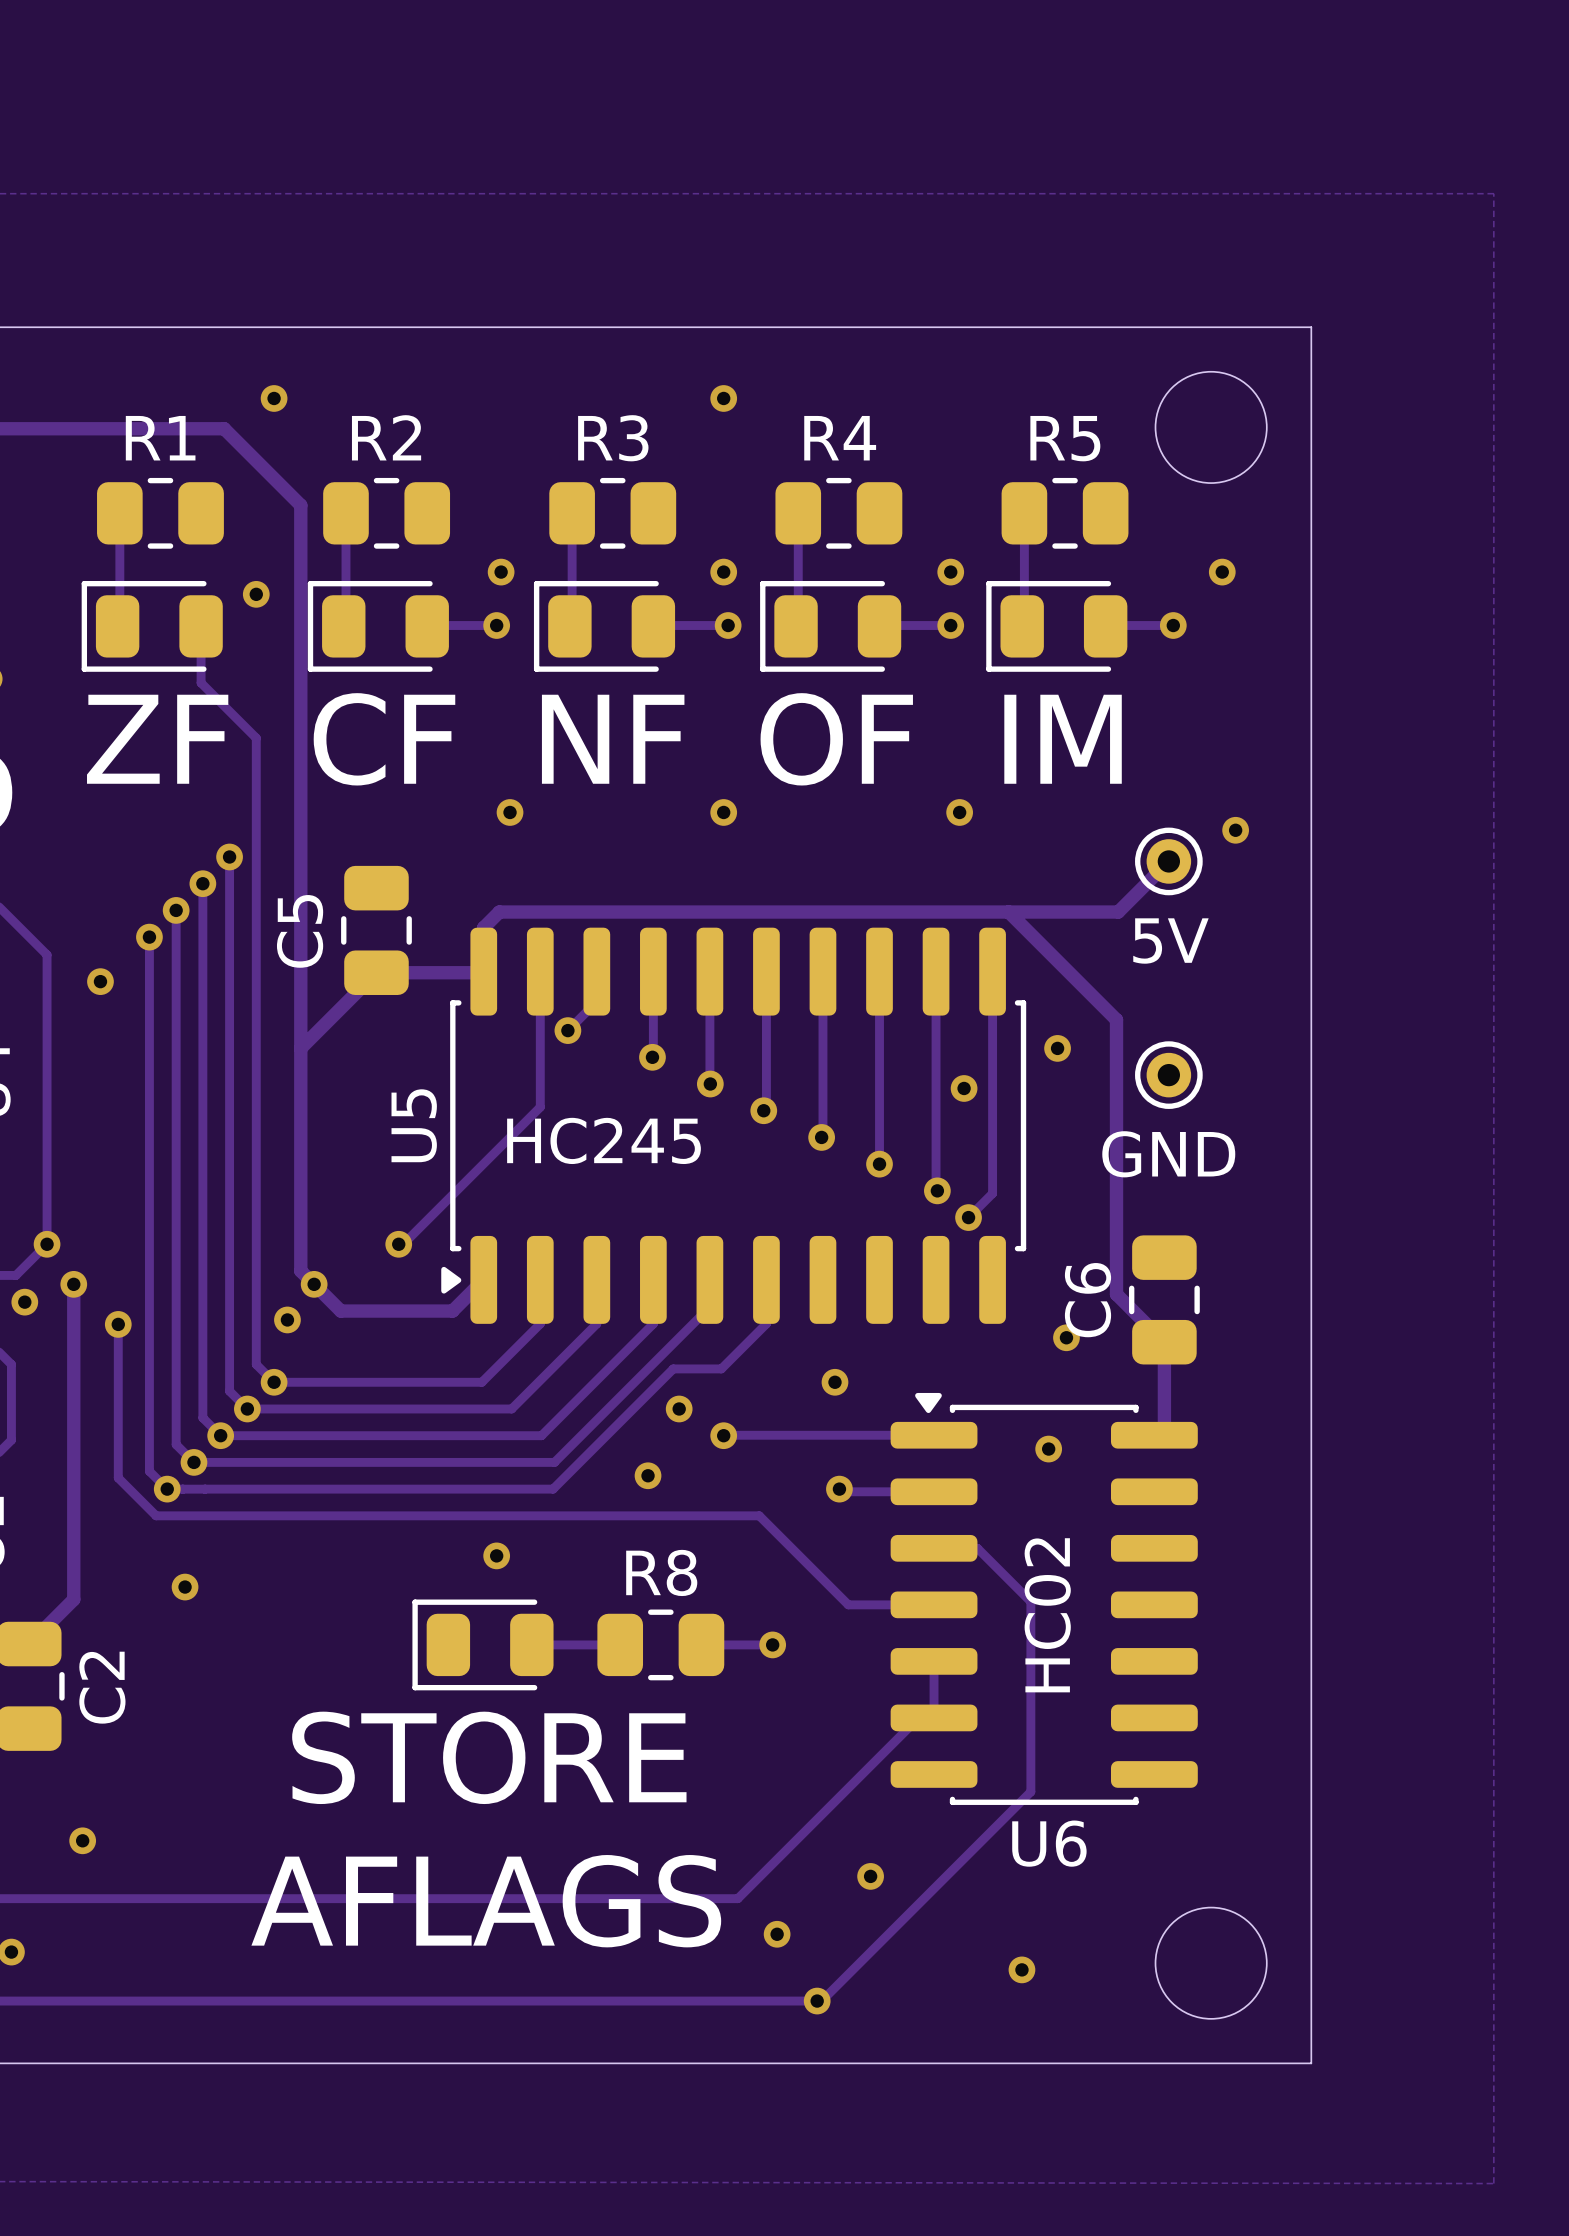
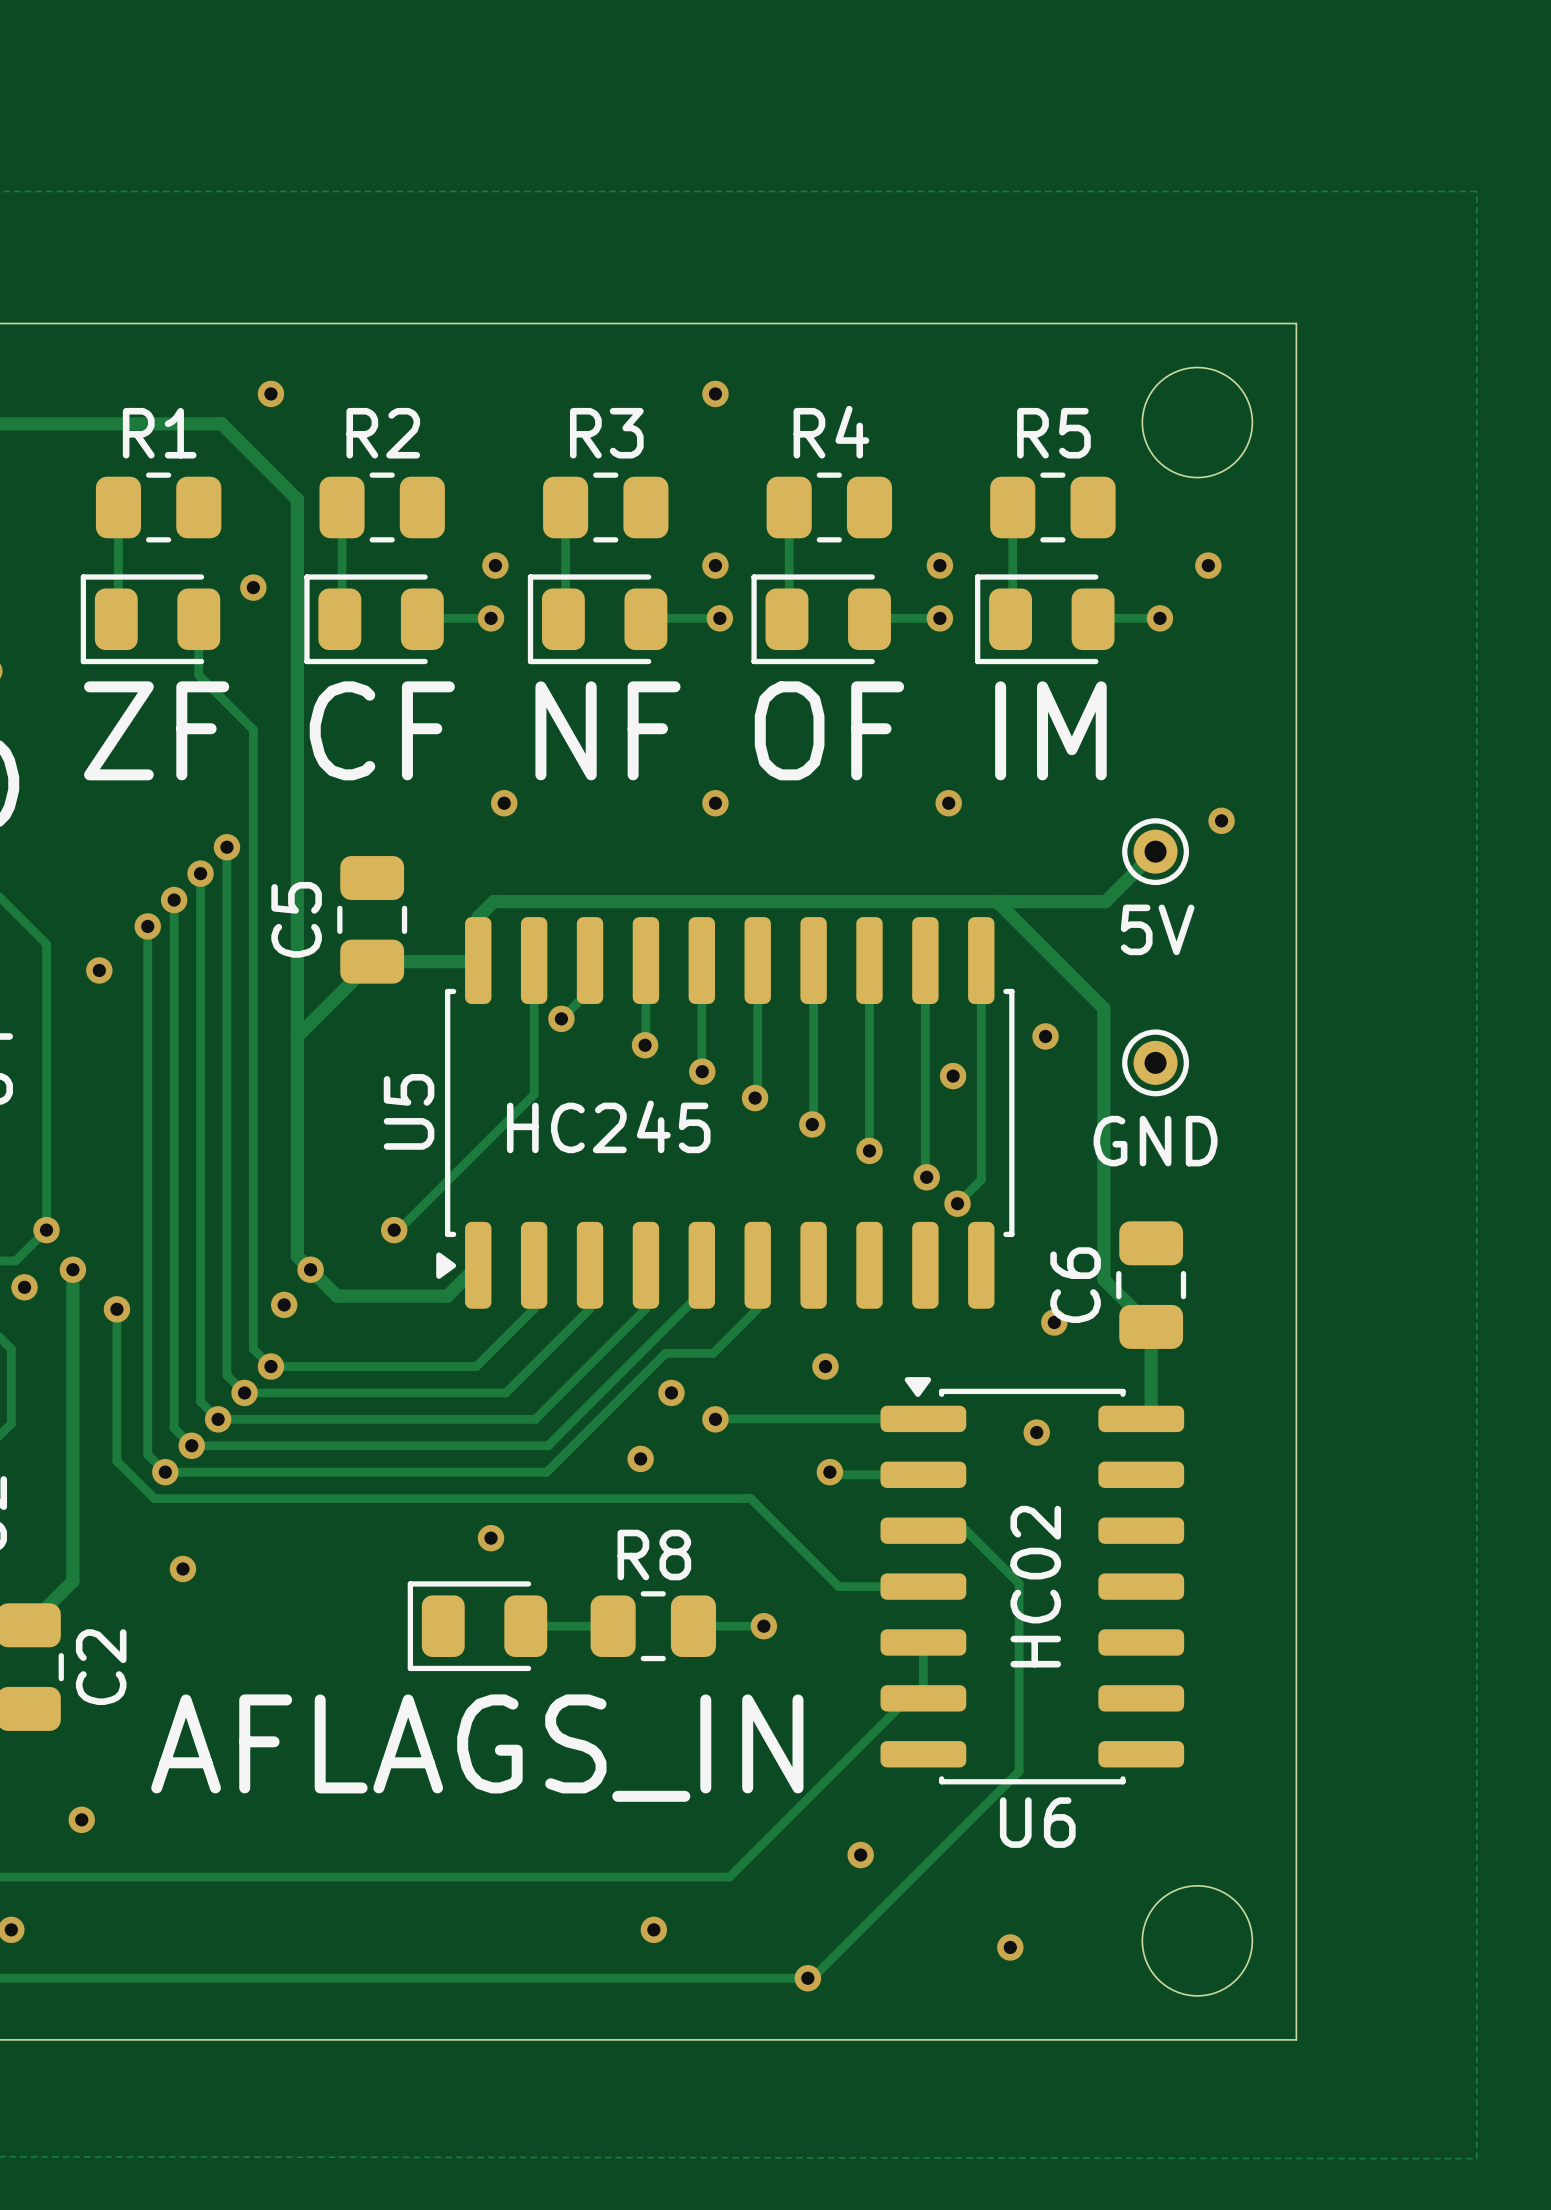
text: STORE (489, 1757) -> AFLAGS_IN (477, 1748)
text: AFLAGS (486, 1901) -> none
via position: (777, 1934) -> (653, 1929)

